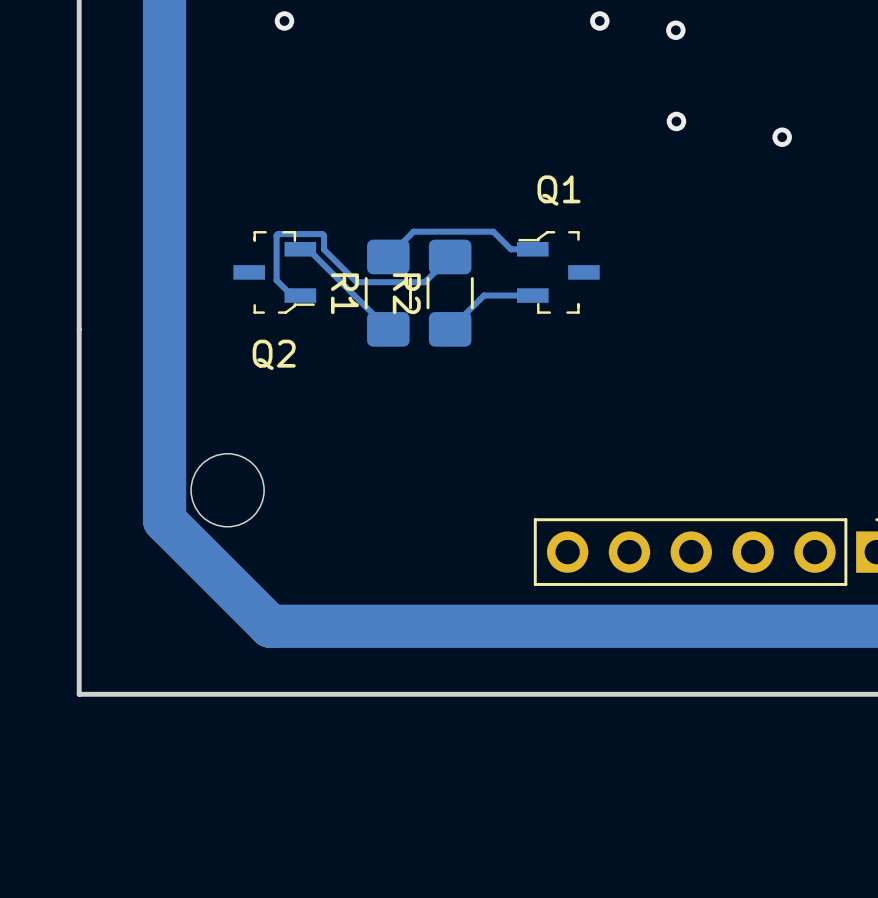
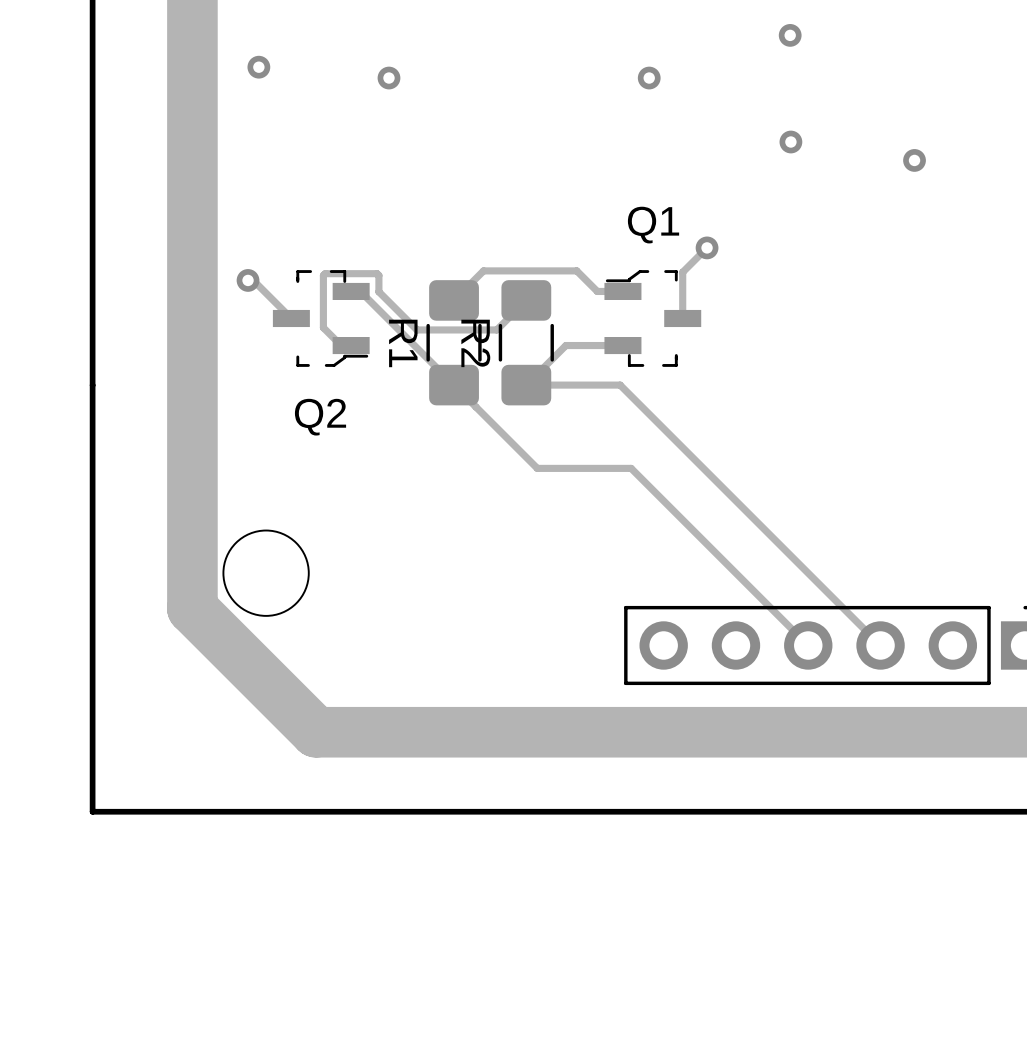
via: (284, 20) -> none
via position: (599, 20) -> (649, 78)
via: none -> (258, 67)
via: none -> (388, 78)
track: none -> (707, 247) (682, 272) (682, 318)
via: none -> (707, 247)
track: none -> (248, 280) (253, 280) (291, 318)
via: none -> (248, 280)
track: none -> (454, 385) (537, 468) (631, 468) (808, 645)
track: none -> (526, 385) (620, 385) (880, 645)

